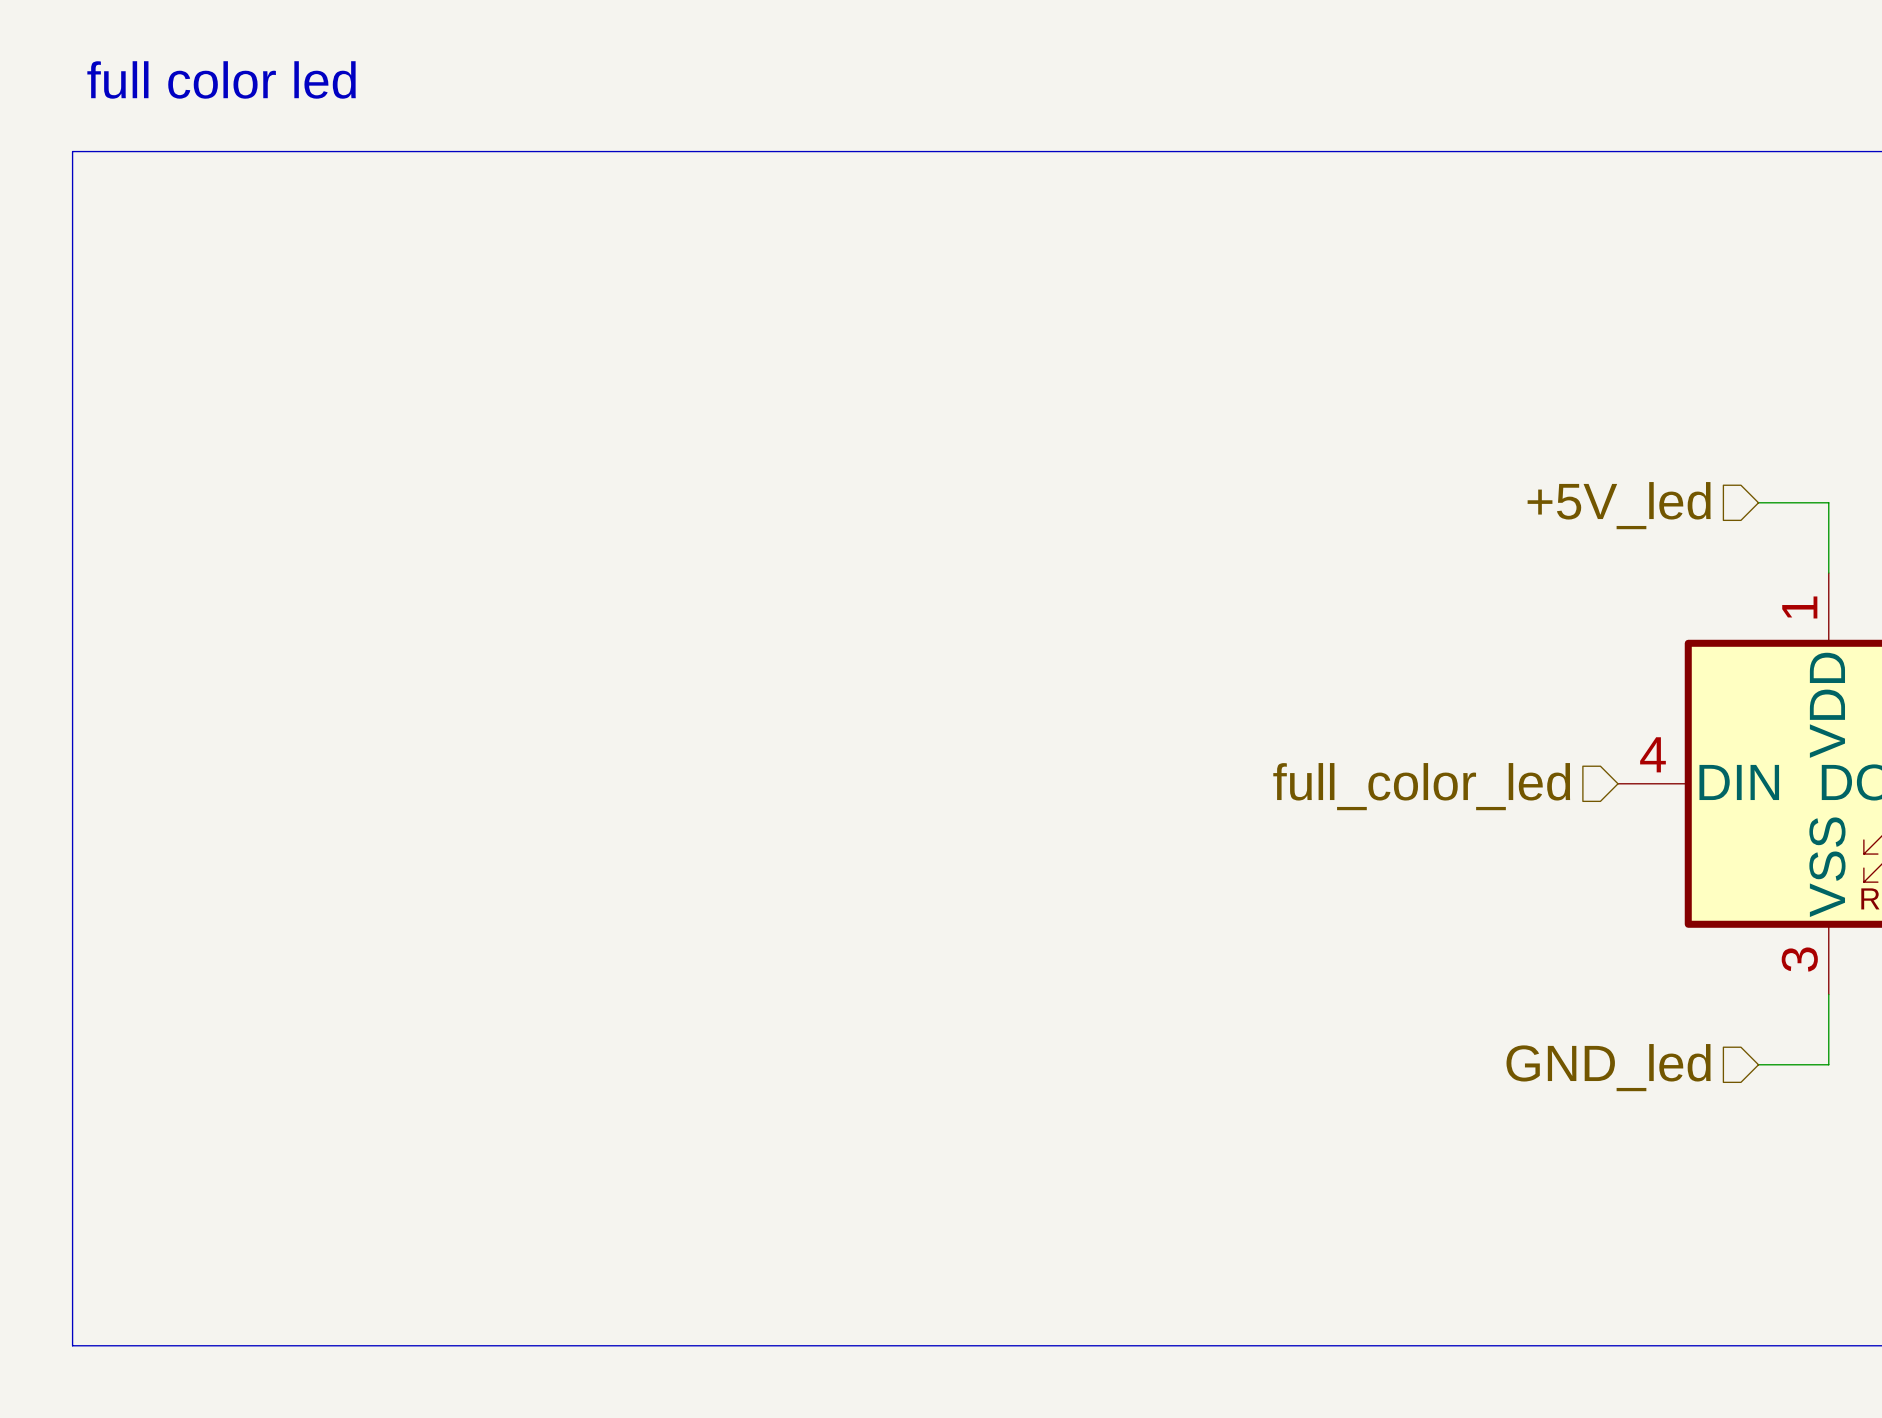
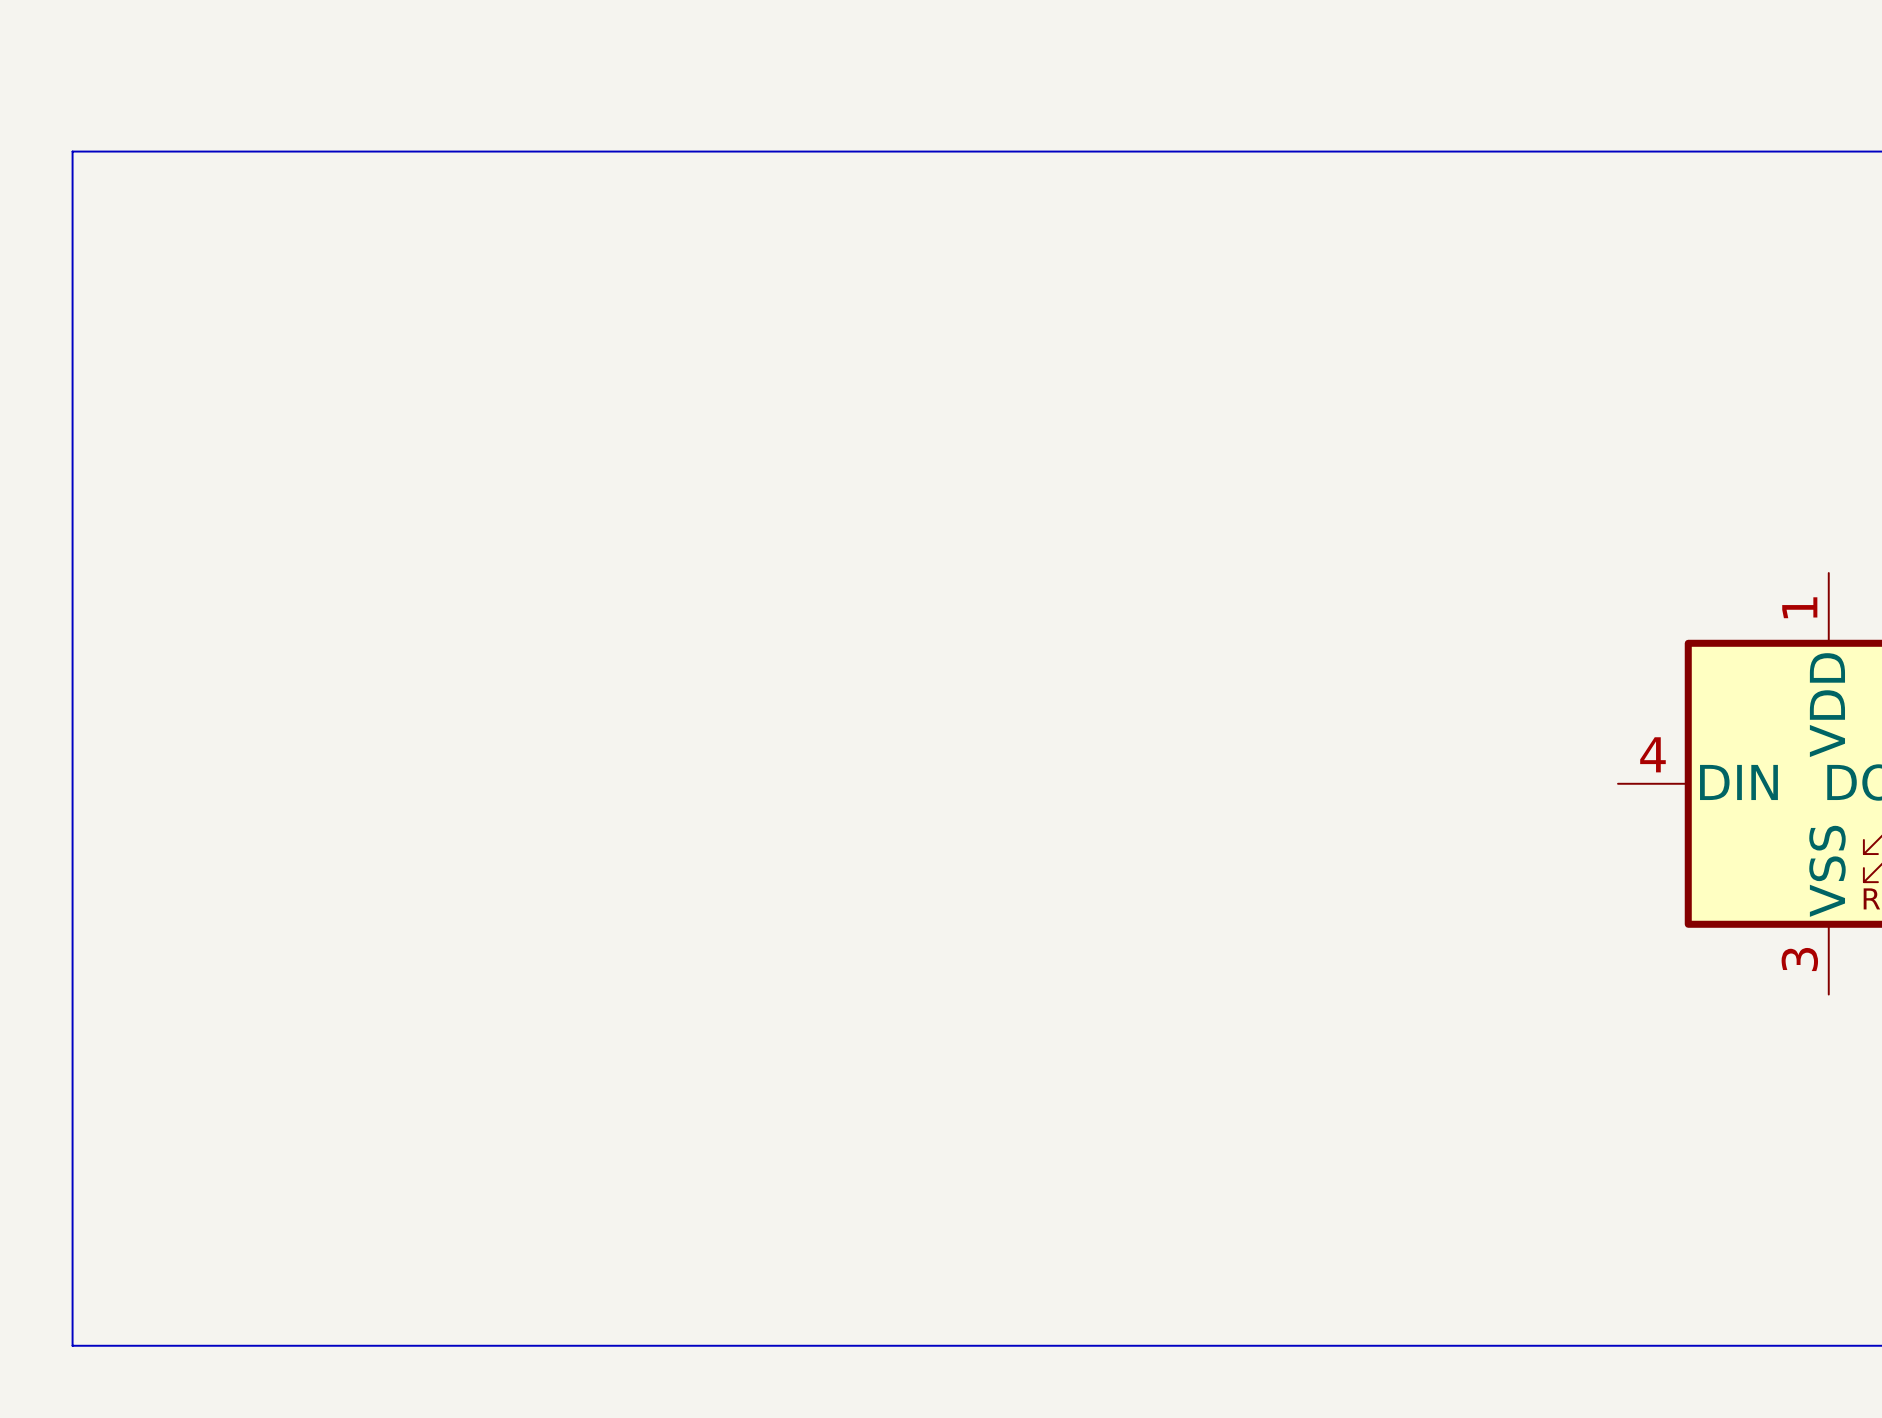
text: full color led (221, 79) -> none
wire: (1758, 502) (1828, 502) (1828, 573) -> none
hierarchical label: +5V_led (1619, 505) -> none
hierarchical label: full_color_led (1421, 786) -> none
wire: (1828, 994) (1828, 1064) (1758, 1064) -> none
hierarchical label: GND_led (1608, 1067) -> none

